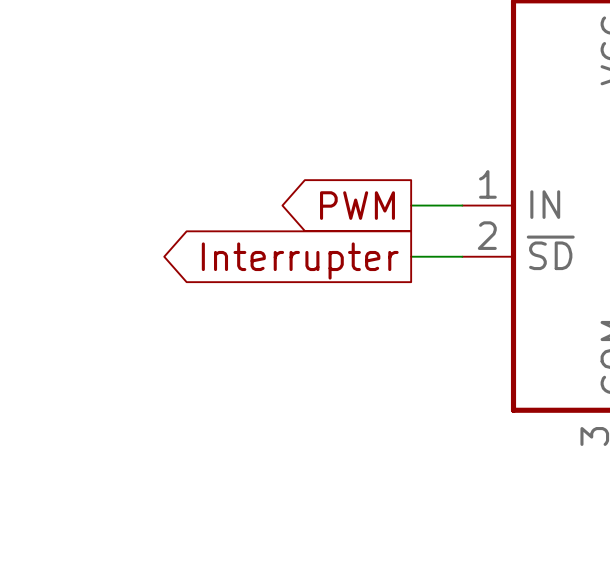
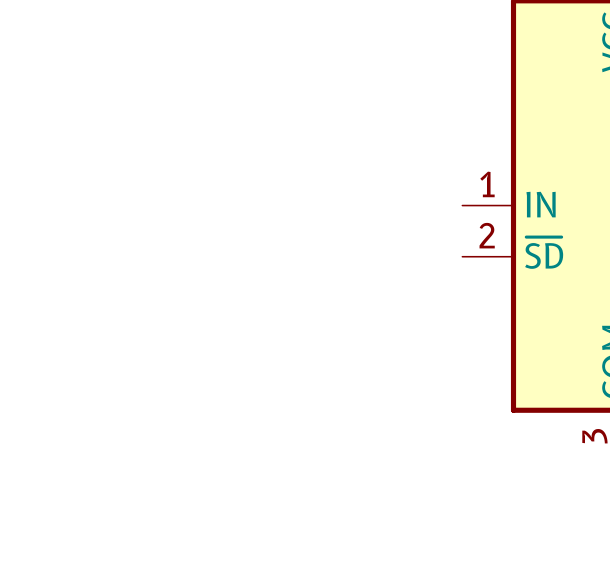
global label: PWM (357, 205) -> none
wire: (411, 205) (462, 205) -> none
wire: (411, 256) (462, 256) -> none
global label: Interrupter (300, 260) -> none

